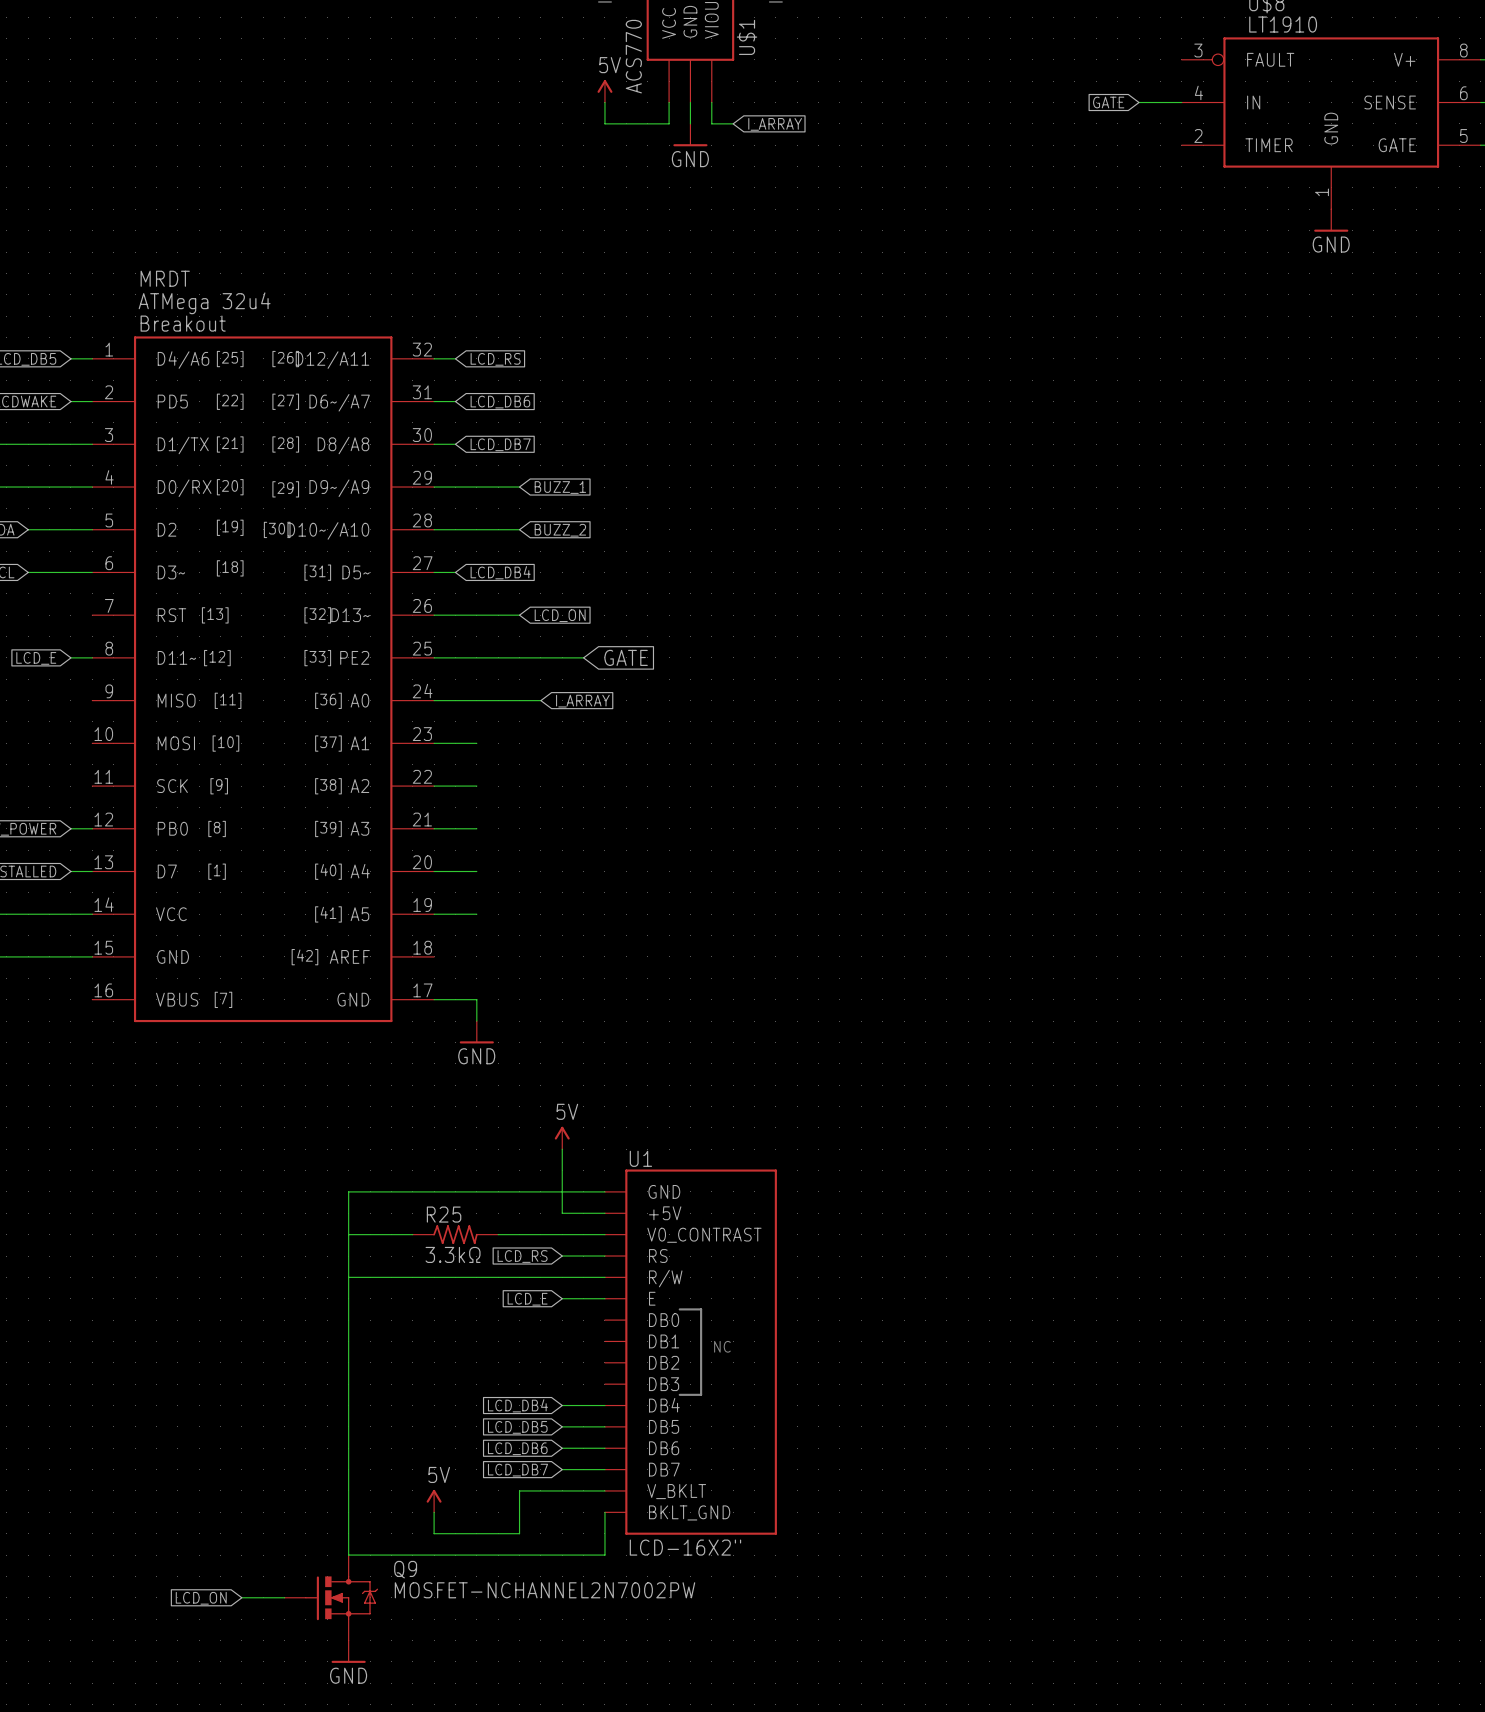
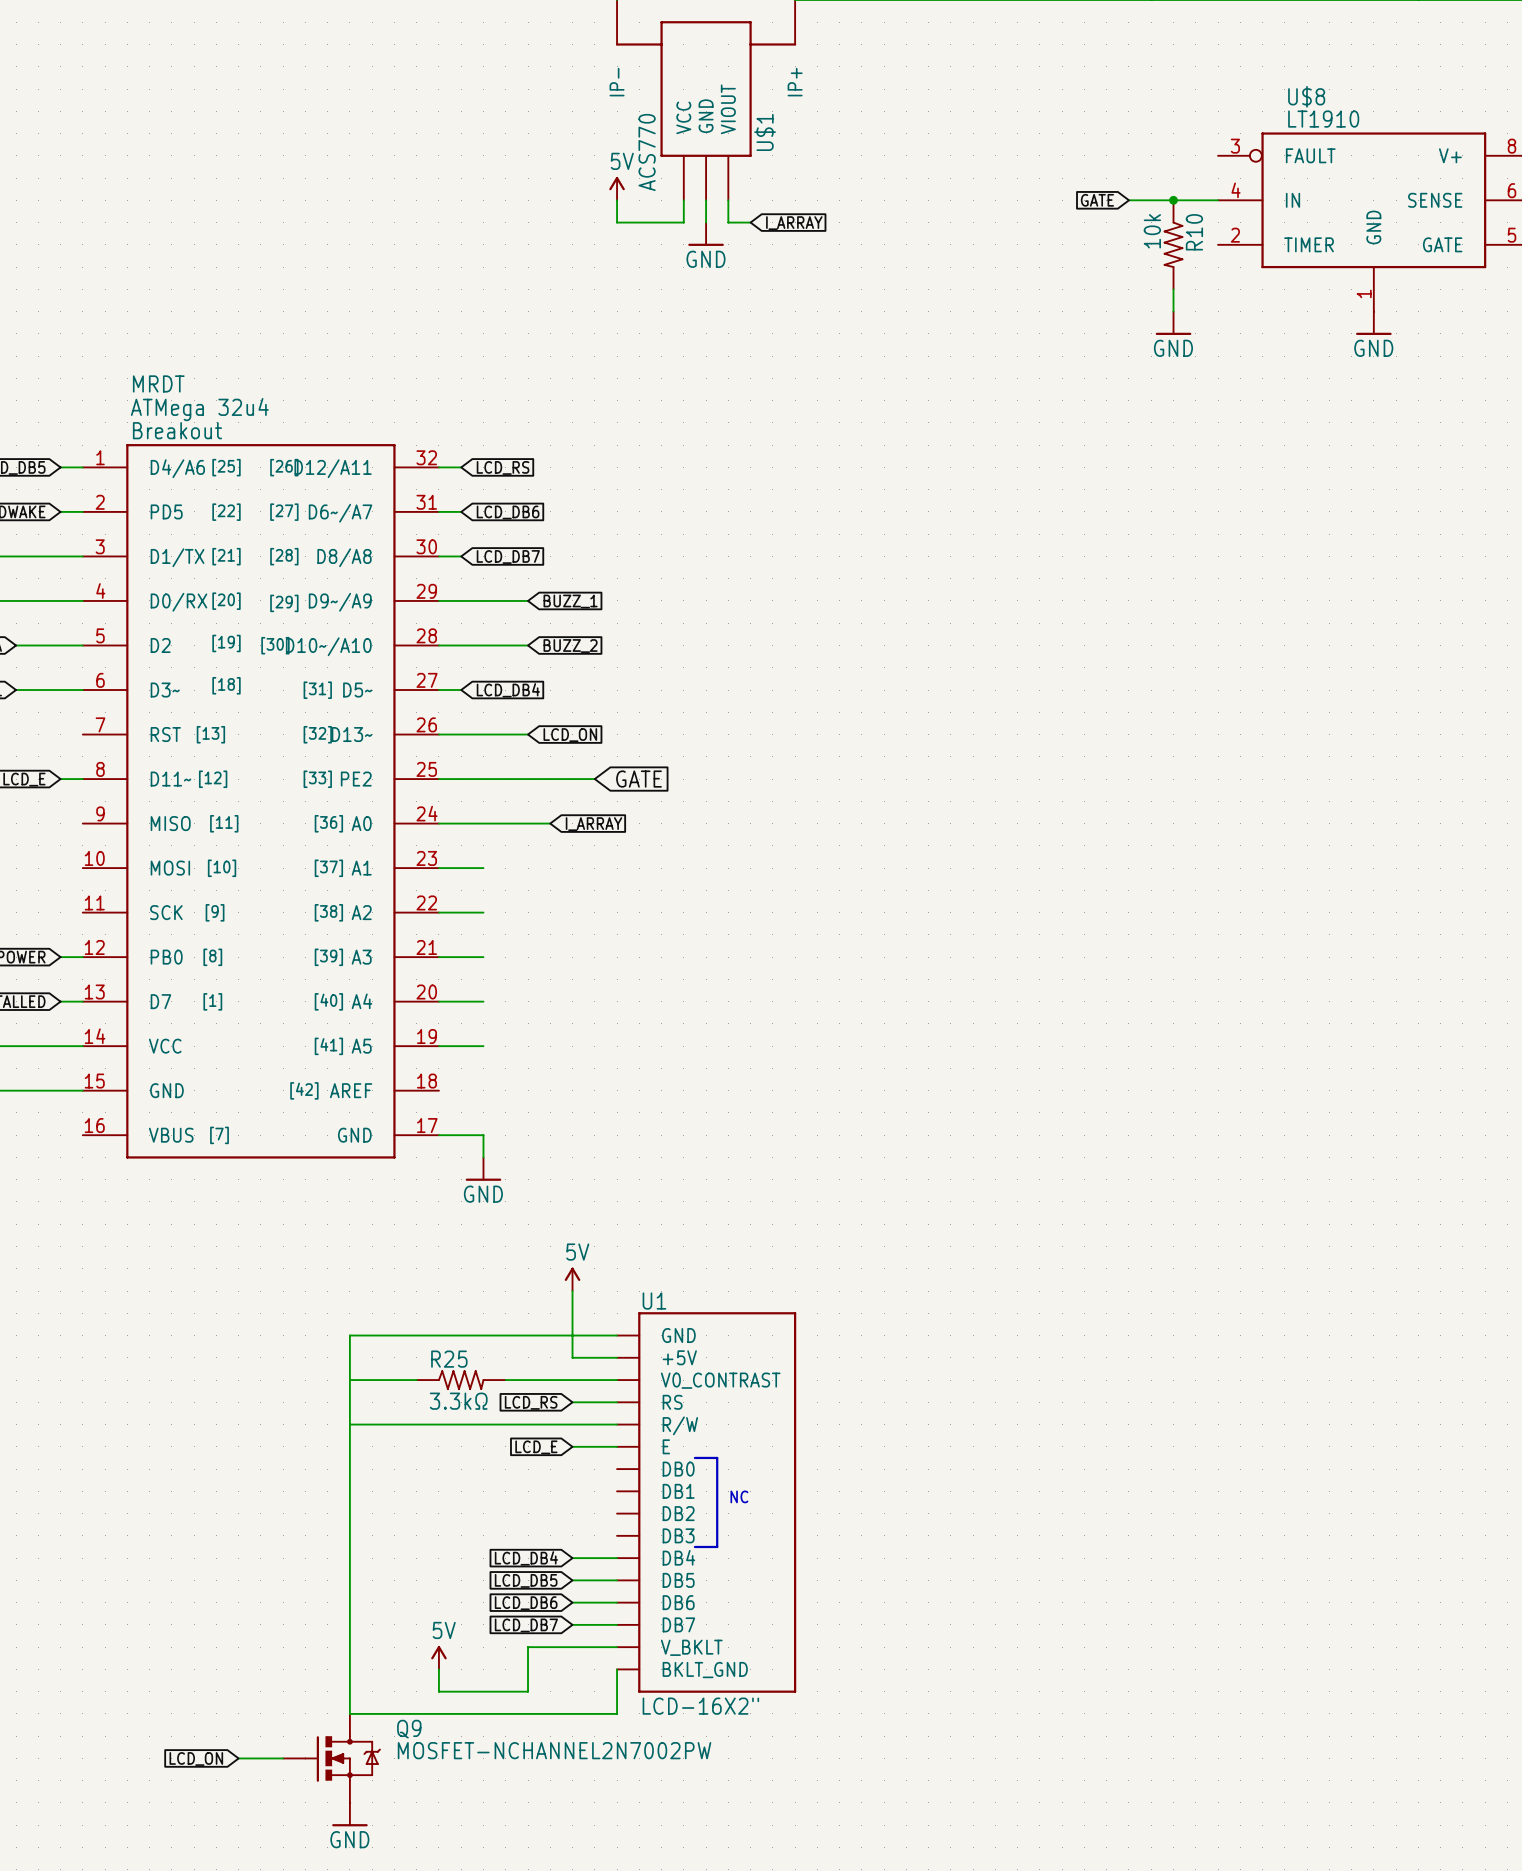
wire: none -> (1128, 200) (1173, 200)
global label position: GATE (1108, 102) -> GATE (1097, 200)
junction: none -> (1173, 200)
R10: none -> 10k (1173, 244)
wire: none -> (1173, 289) (1173, 311)
power symbol: none -> GND (1173, 323)

